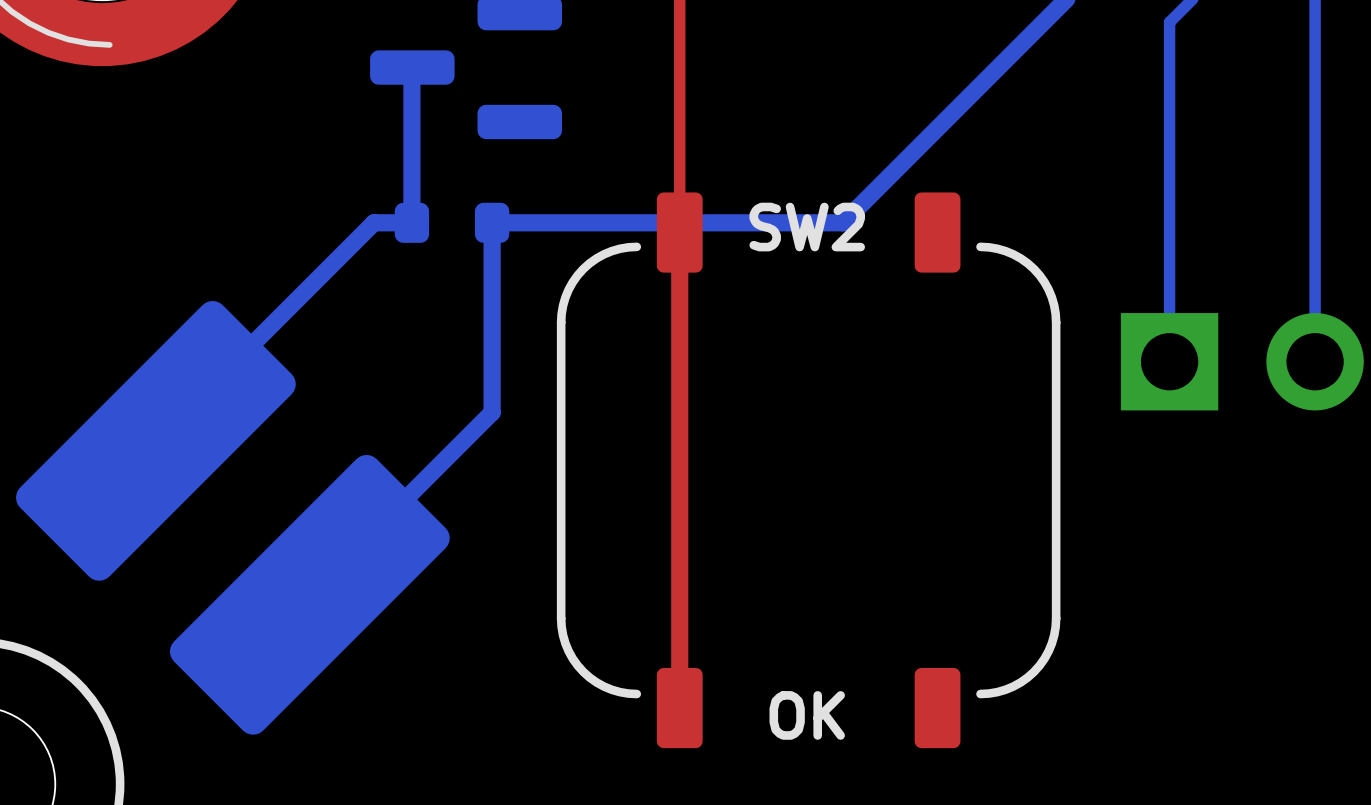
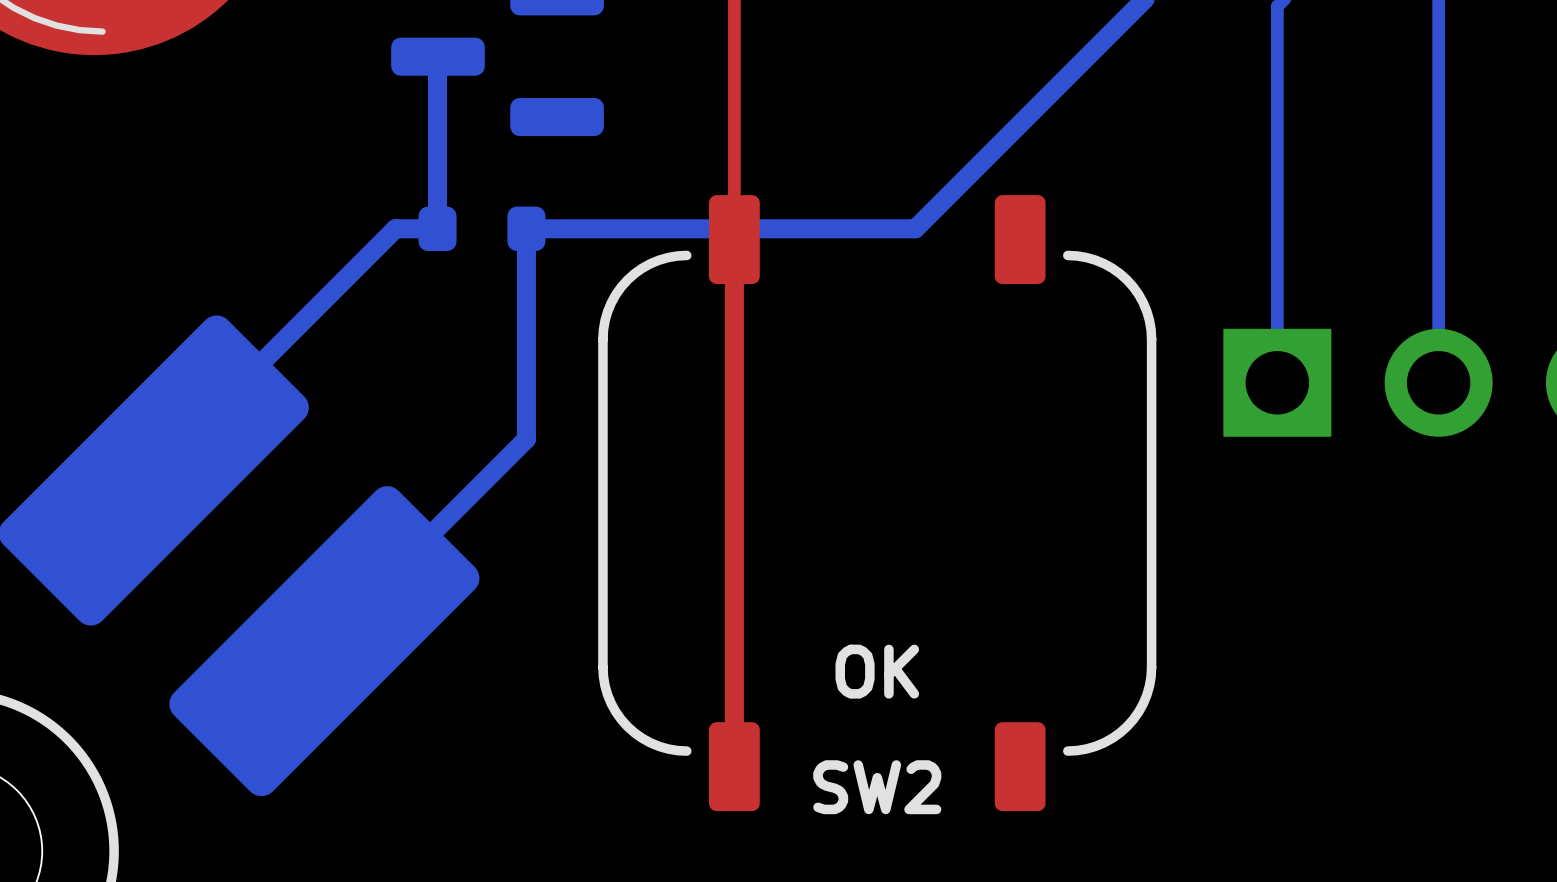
SW2 name position: SW2 (807, 227) -> SW2 (877, 787)
text position: OK (807, 715) -> OK (877, 671)

